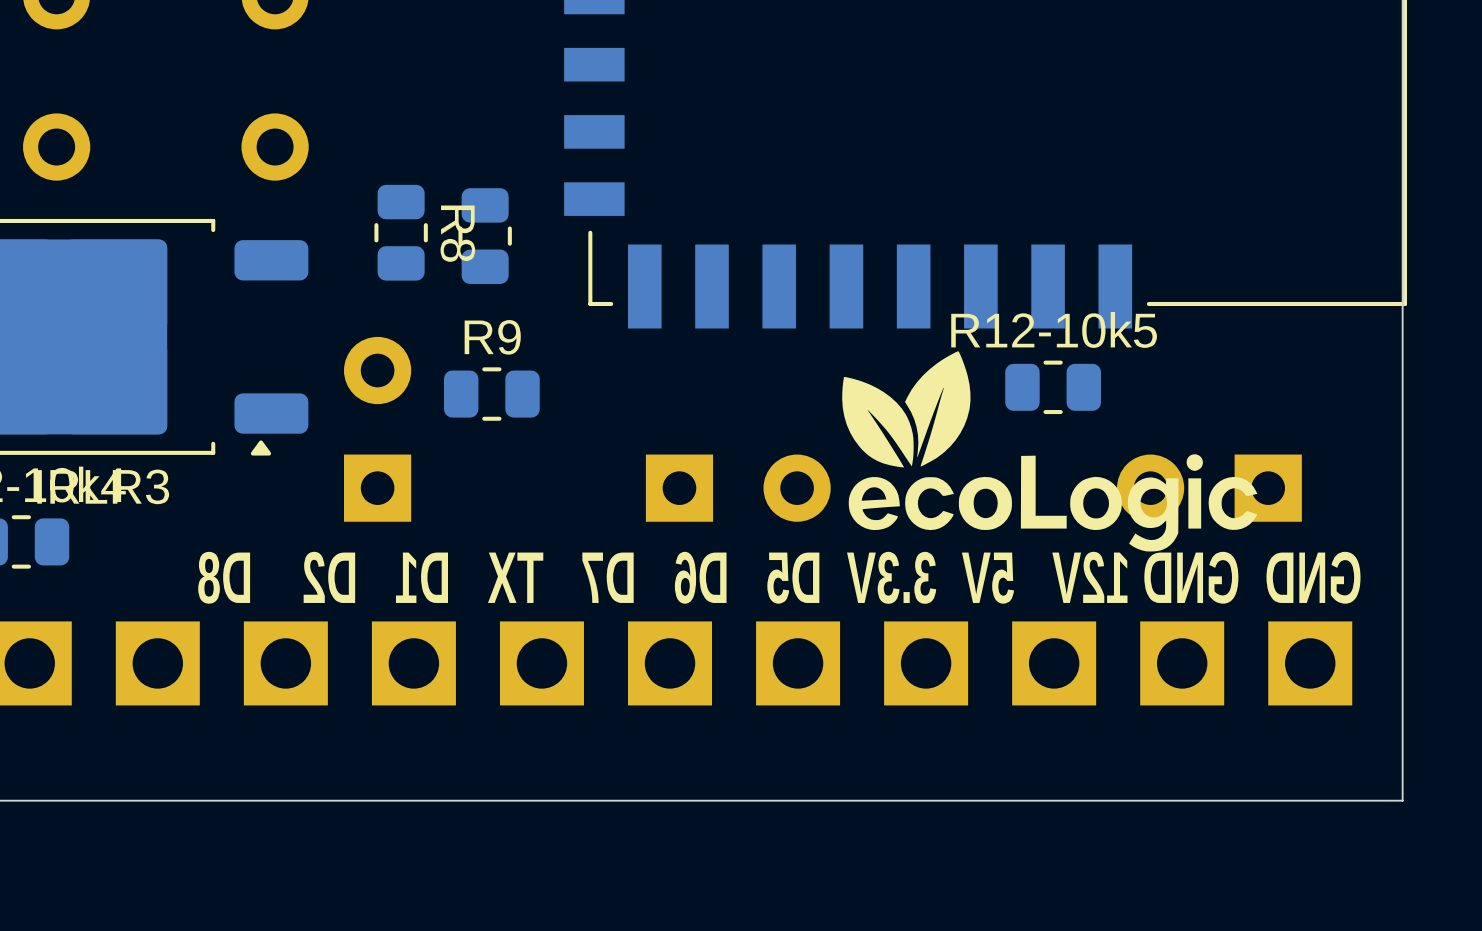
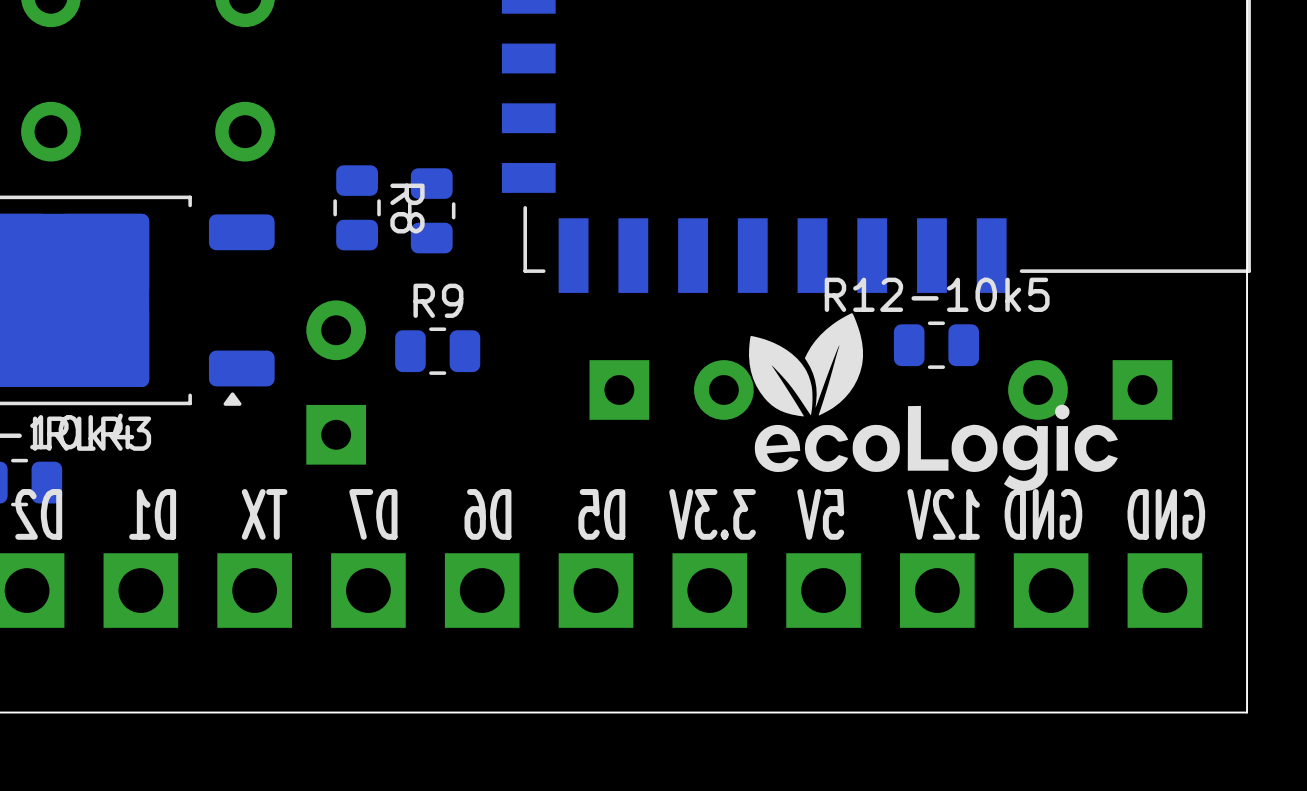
part position: (738, 488) -> (671, 389)
part position: (1209, 488) -> (1090, 389)

